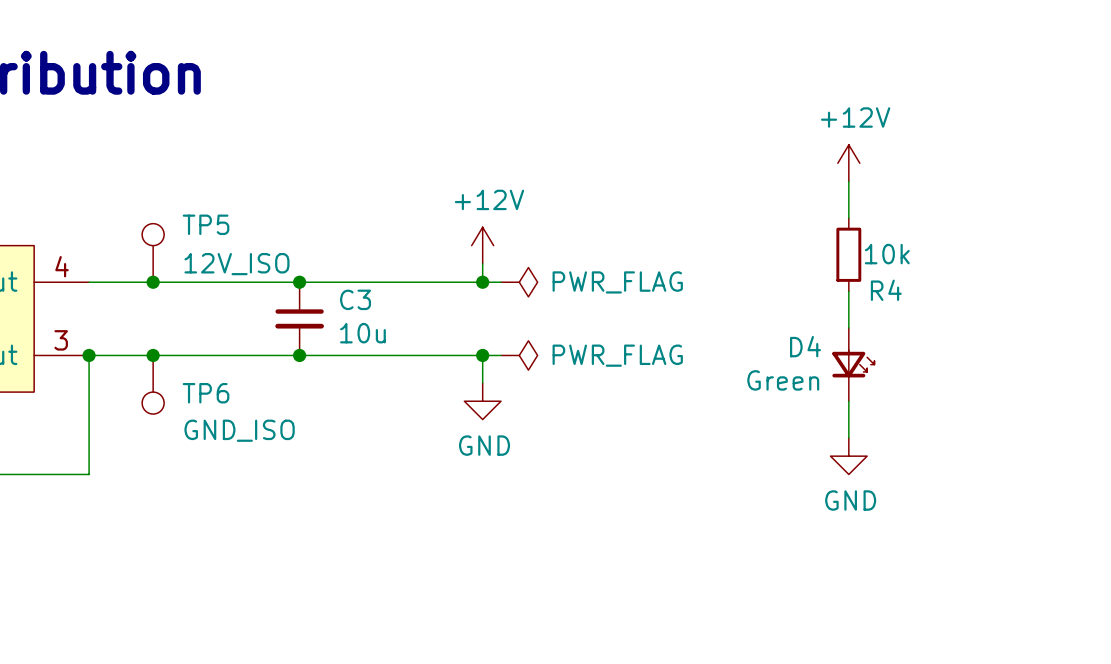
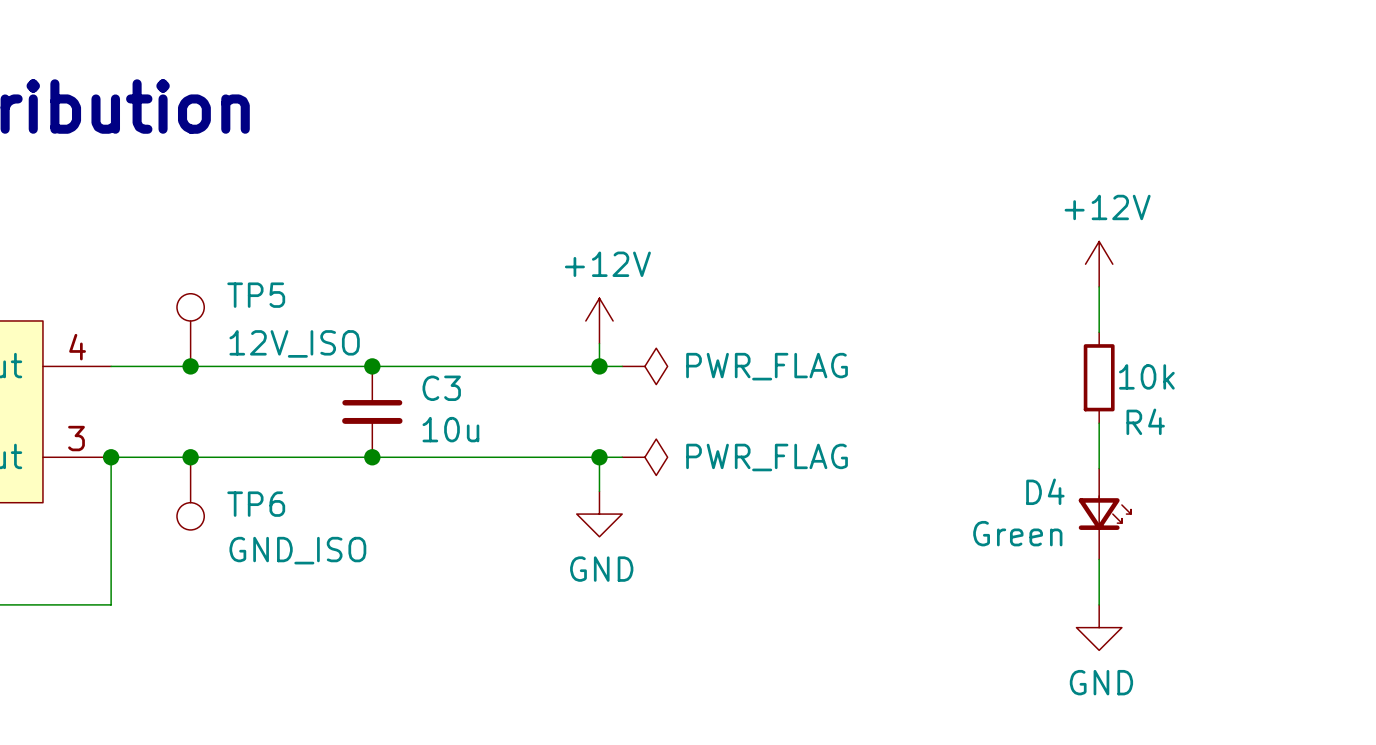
power symbol position: +12V (848, 163) -> +12V (1099, 264)
wire: (848, 181) (848, 218) -> (1099, 286) (1099, 332)
R4 position: (848, 254) -> (1099, 377)
wire: (848, 291) (848, 328) -> (1099, 423) (1099, 468)
D4 position: (853, 364) -> (1104, 514)
wire: (848, 401) (848, 437) -> (1099, 559) (1099, 604)
power symbol position: GND (848, 456) -> GND (1099, 627)

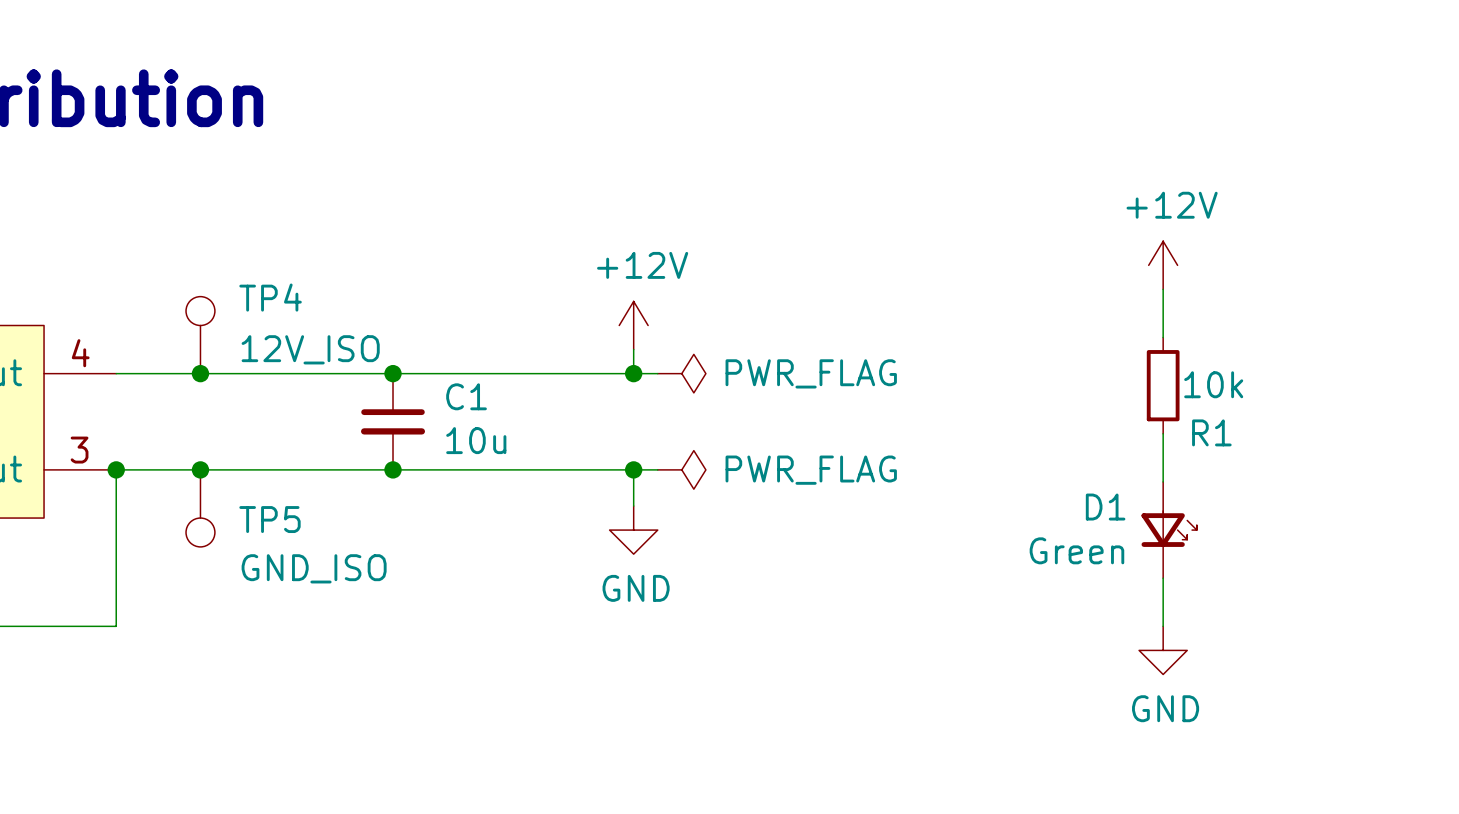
TP5 name: TP5 (256, 295) -> TP4 (270, 297)
C3 name: C3 (441, 388) -> C1 (466, 396)
R4 name: R4 (1145, 421) -> R1 (1211, 432)
D4 name: D4 (1045, 491) -> D1 (1105, 507)
TP6 name: TP6 (256, 504) -> TP5 (269, 519)

